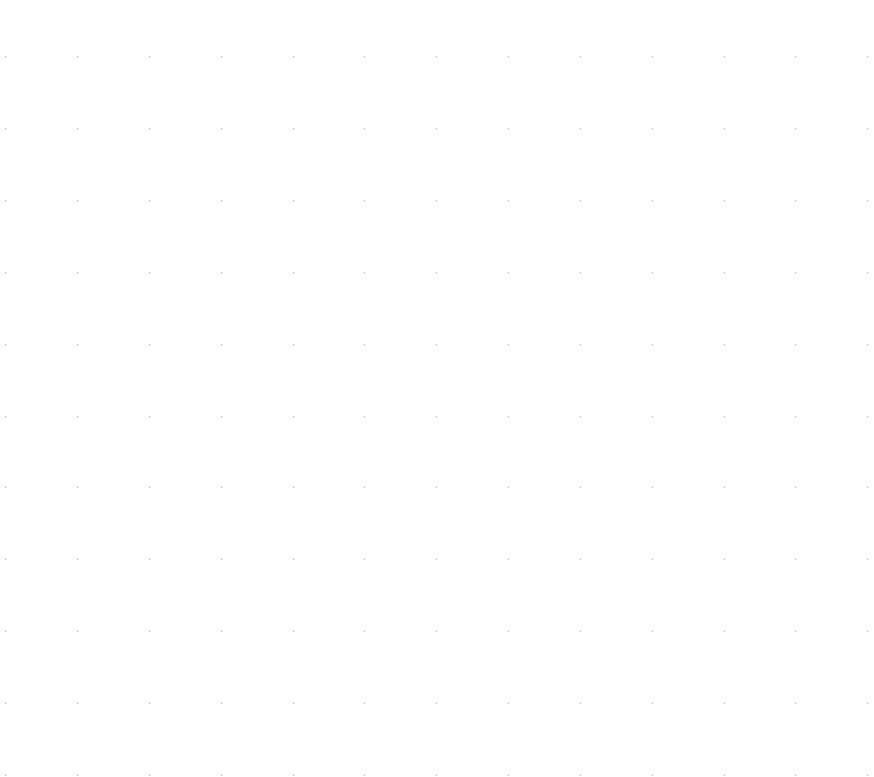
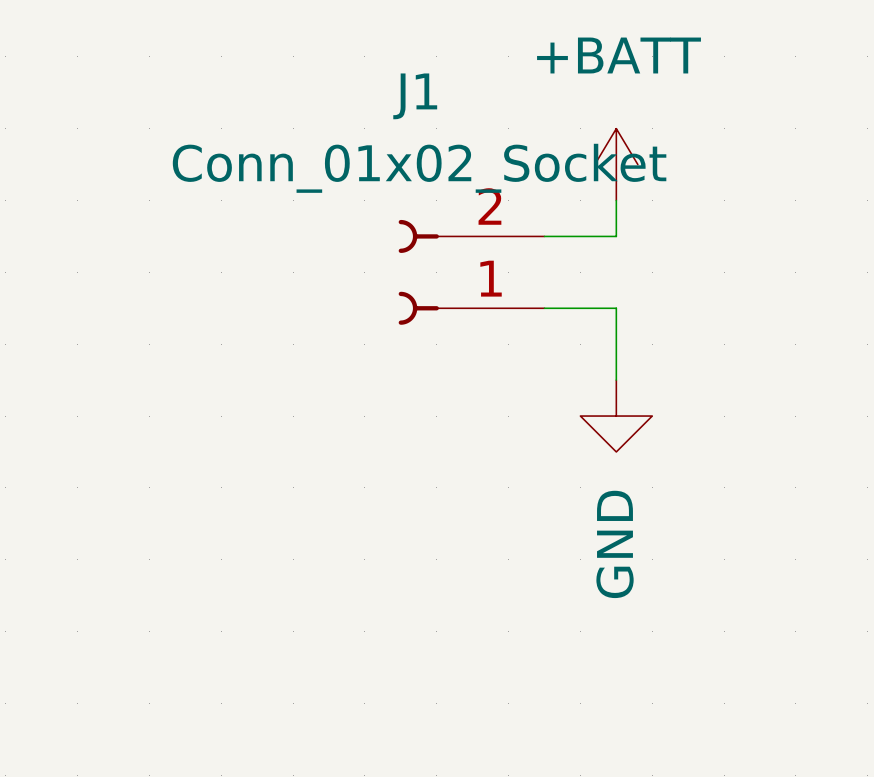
power symbol: none -> +BATT (616, 164)
wire: none -> (616, 200) (616, 236) (544, 236)
J1: none -> Conn_01x02_Socket (471, 272)
wire: none -> (544, 308) (616, 308) (616, 380)
power symbol: none -> GND (616, 416)

